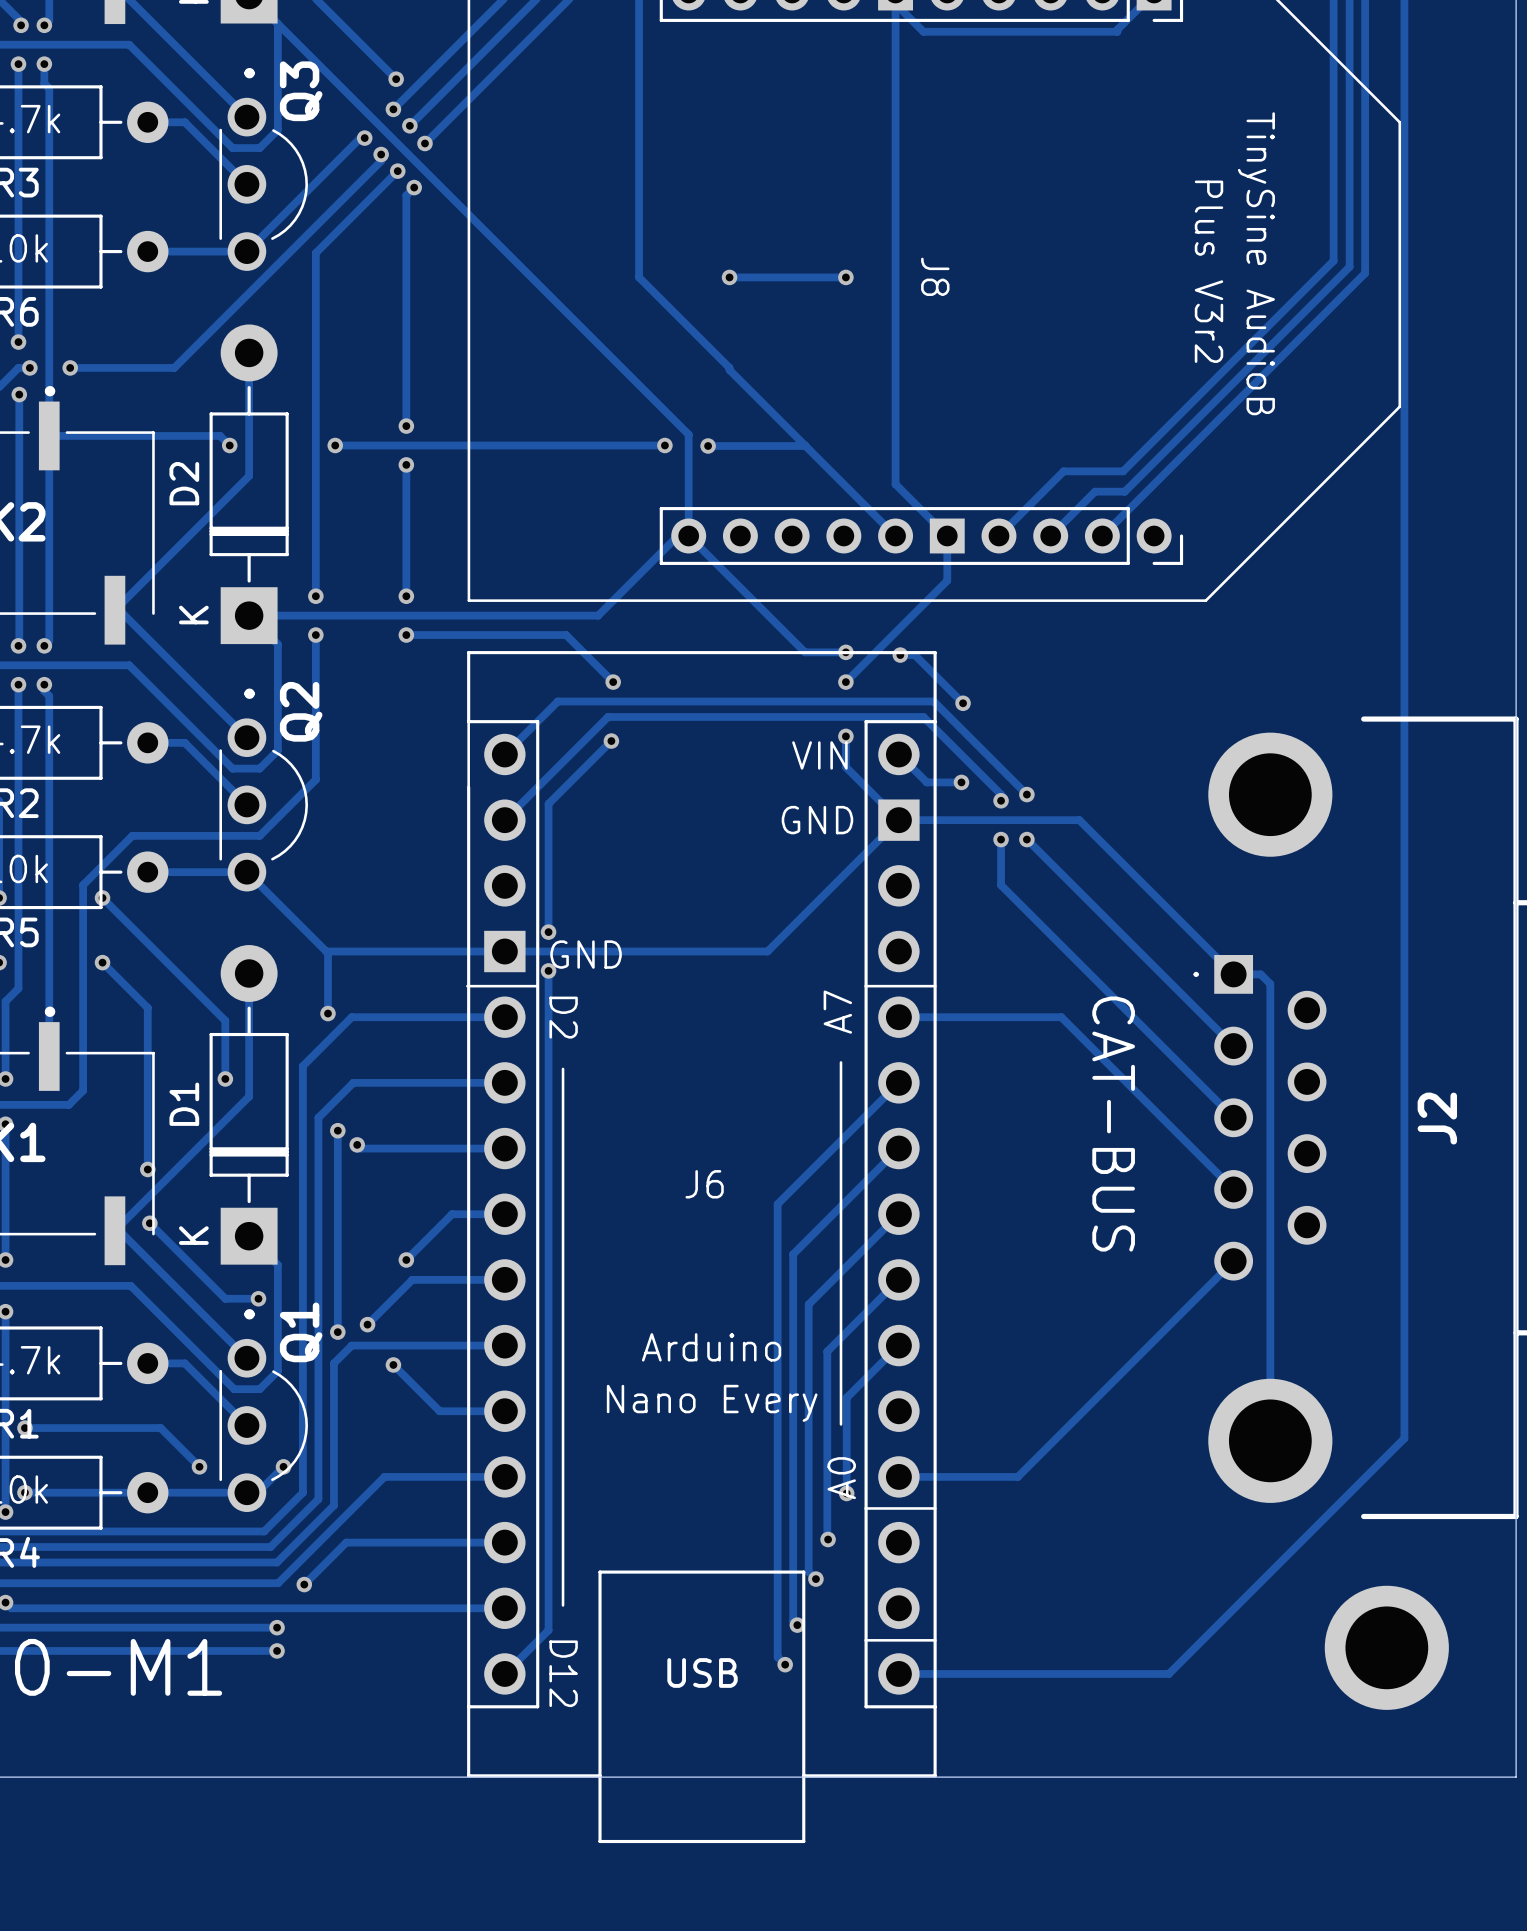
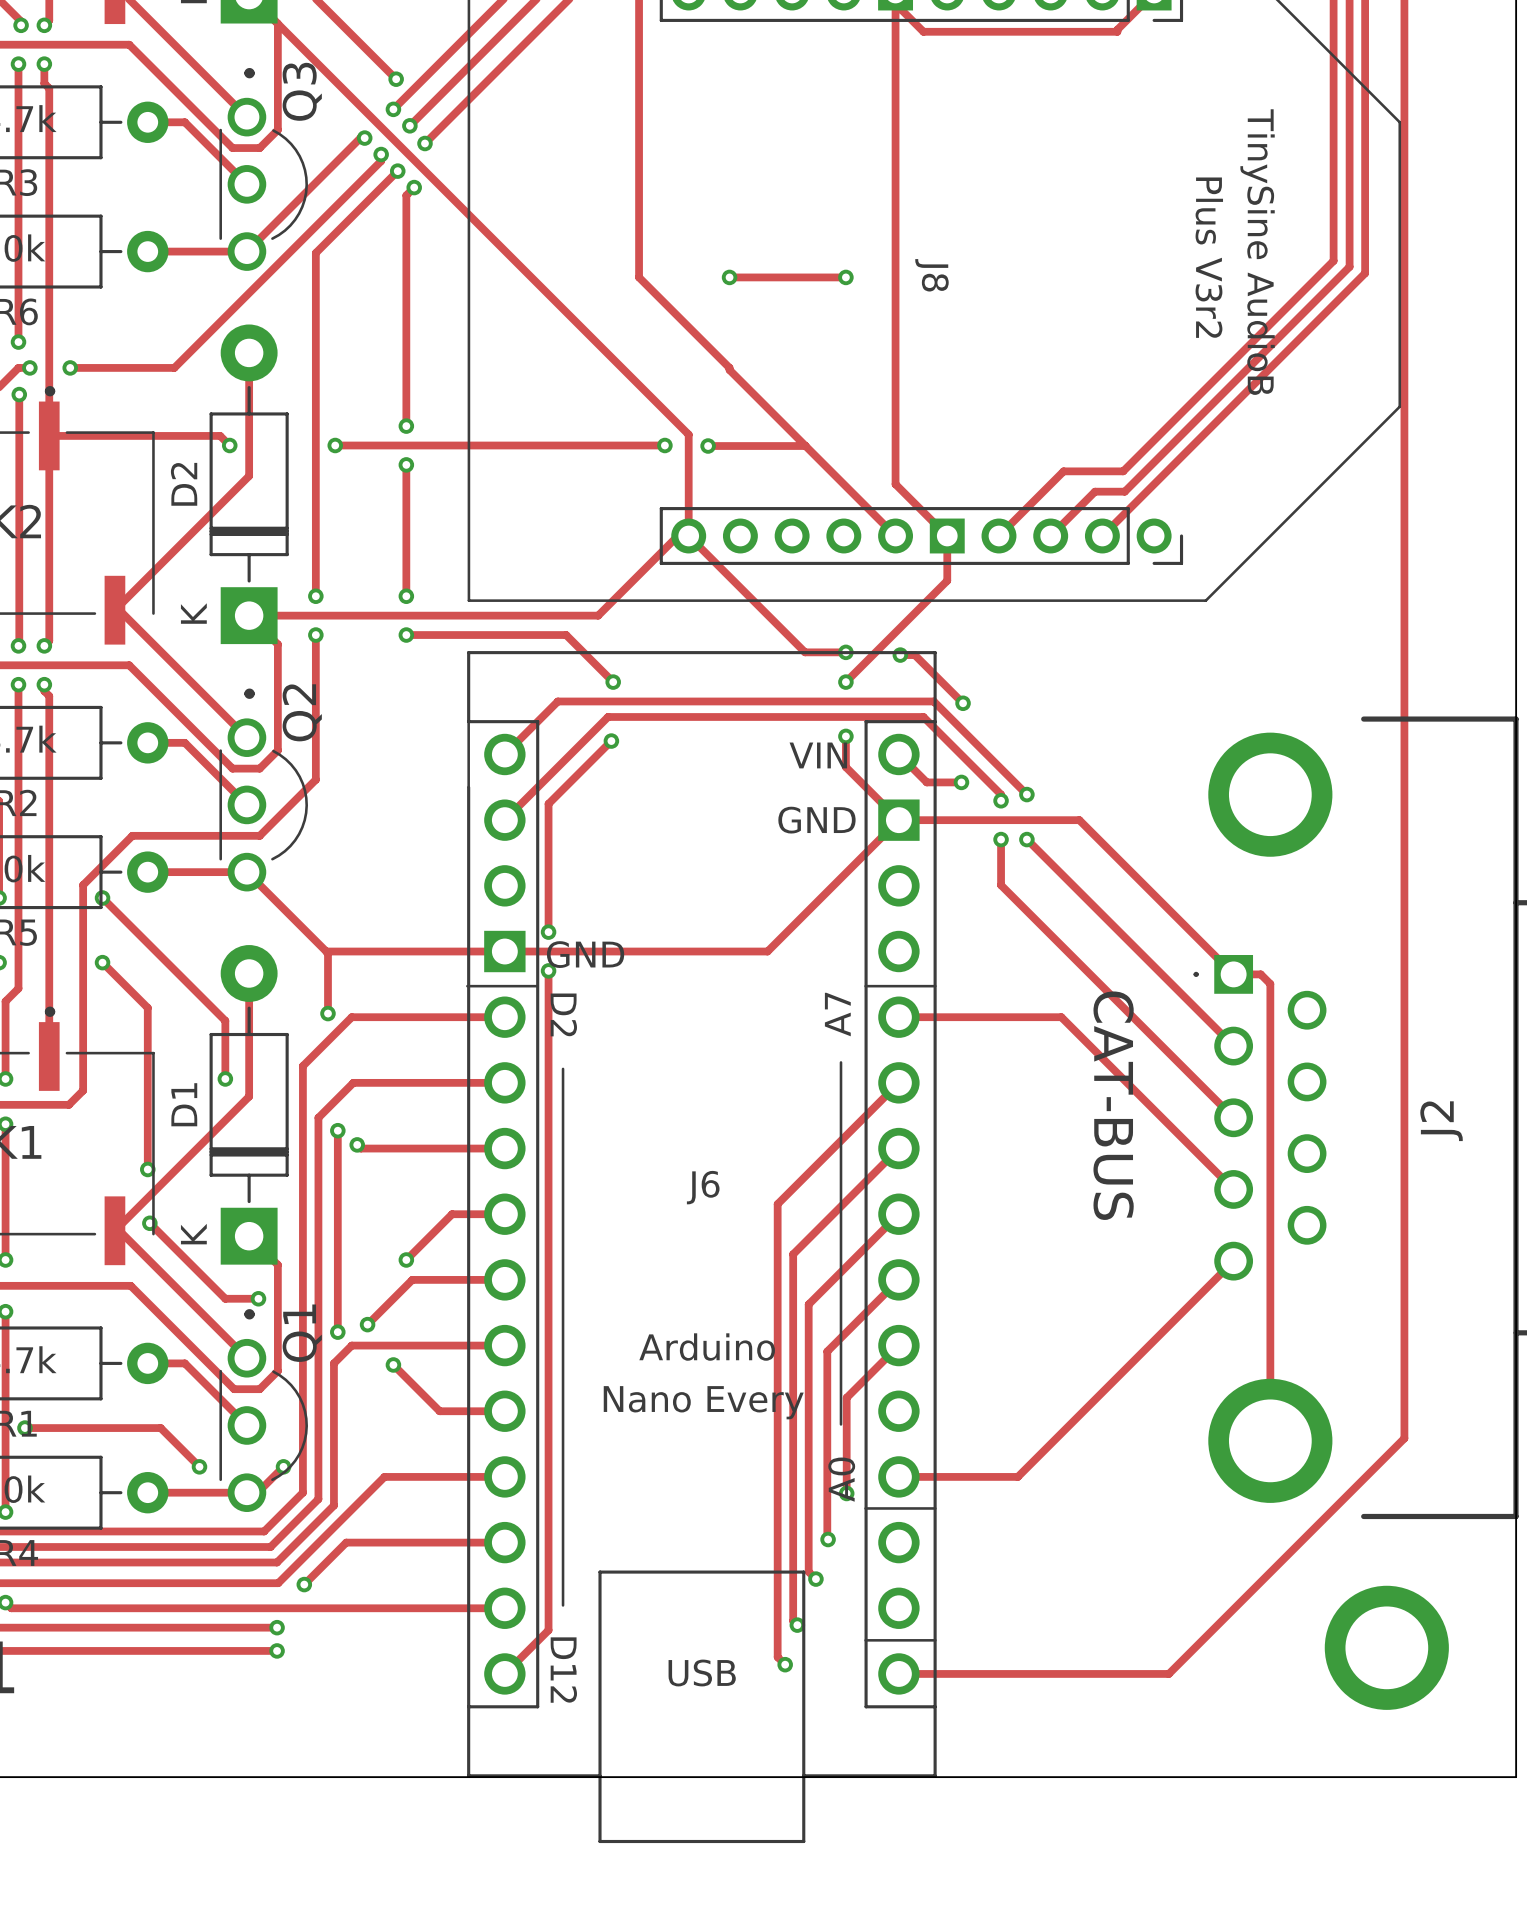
track: (24, 1492) (147, 1492) -> none
via: (24, 1492) -> none

